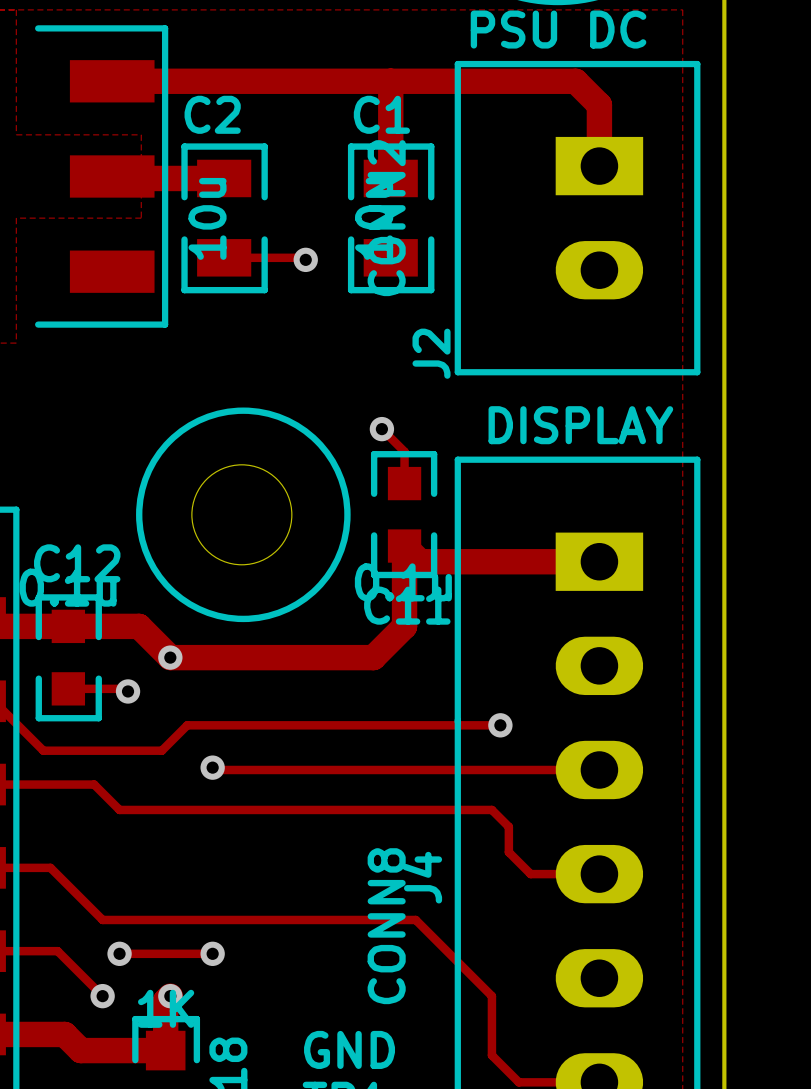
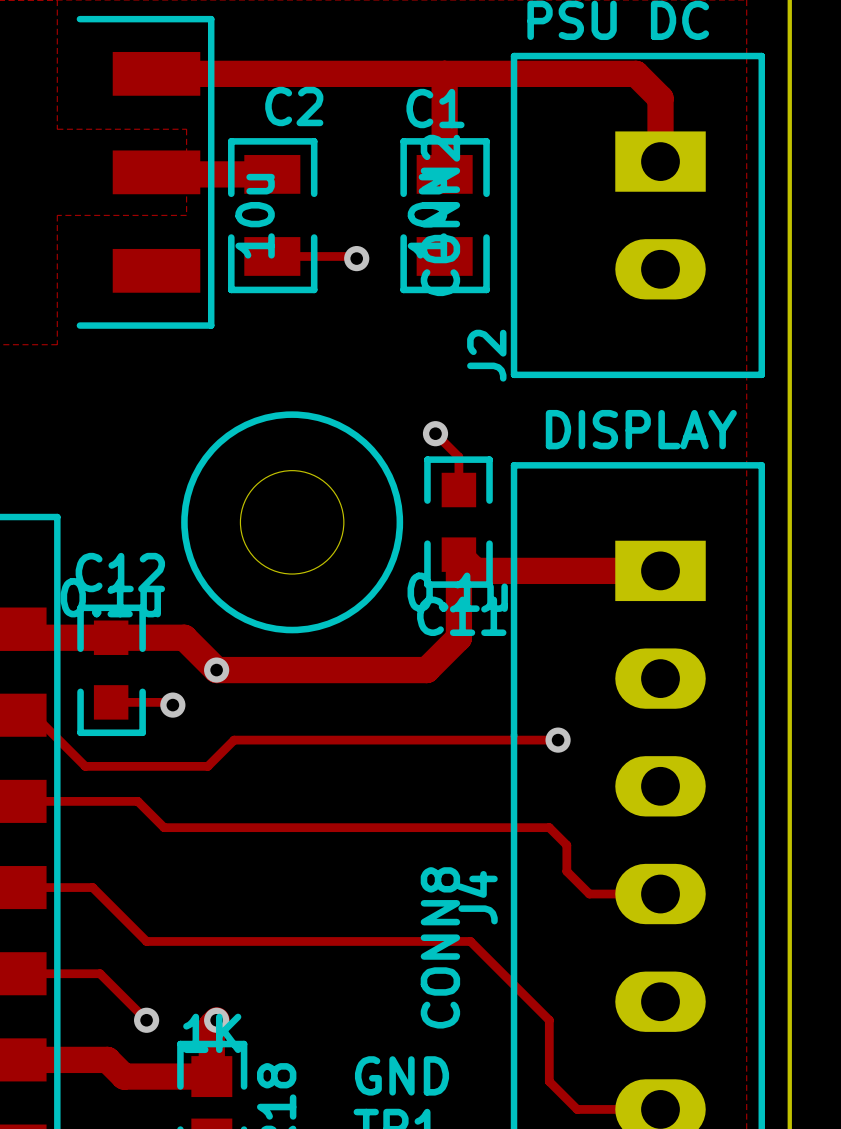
C2 name position: C2 (212, 114) -> C2 (294, 106)
track: (212, 767) (215, 769) (599, 769) -> none
via: (212, 767) -> none
track: (119, 953) (212, 953) -> none
via: (119, 953) -> none
via: (212, 953) -> none

